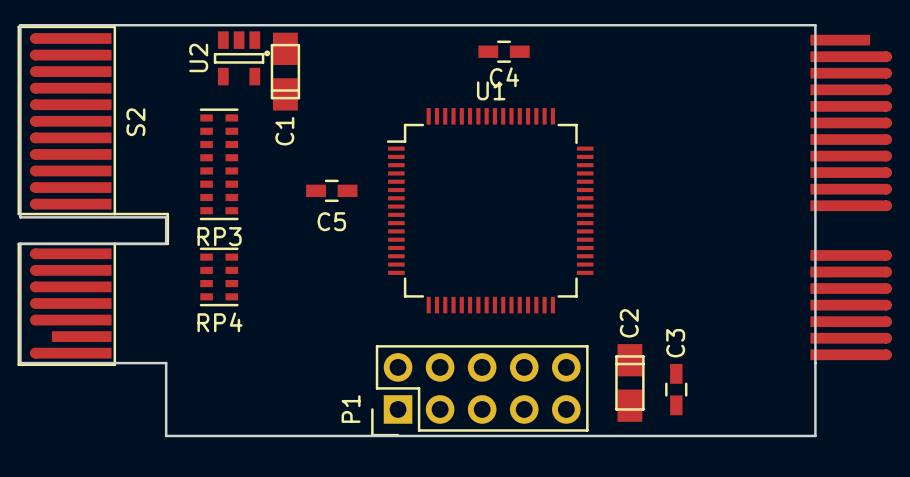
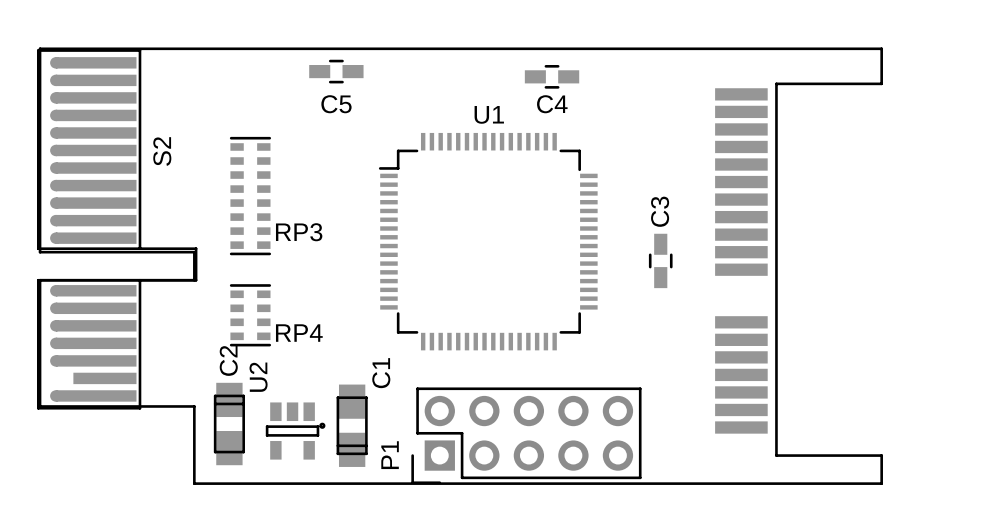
U2 name position: U2 (198, 57) -> U2 (258, 377)
U2 position: (241, 58) -> (295, 431)
board edge: (815, 58) (815, 409) -> (881, 83) (776, 83) (776, 455) (881, 455)
C1 position: (285, 71) -> (352, 425)
C1 name position: C1 (284, 131) -> C1 (381, 373)
C5 position: (331, 190) -> (336, 71)
part: (851, 197) -> none
U1 position: (490, 210) -> (488, 241)
part: none -> (741, 260)
RP3 name position: RP3 (219, 236) -> RP3 (299, 232)
RP4 name position: RP4 (219, 322) -> RP4 (299, 333)
C2 position: (629, 382) -> (229, 424)
C3 position: (676, 389) -> (660, 260)

